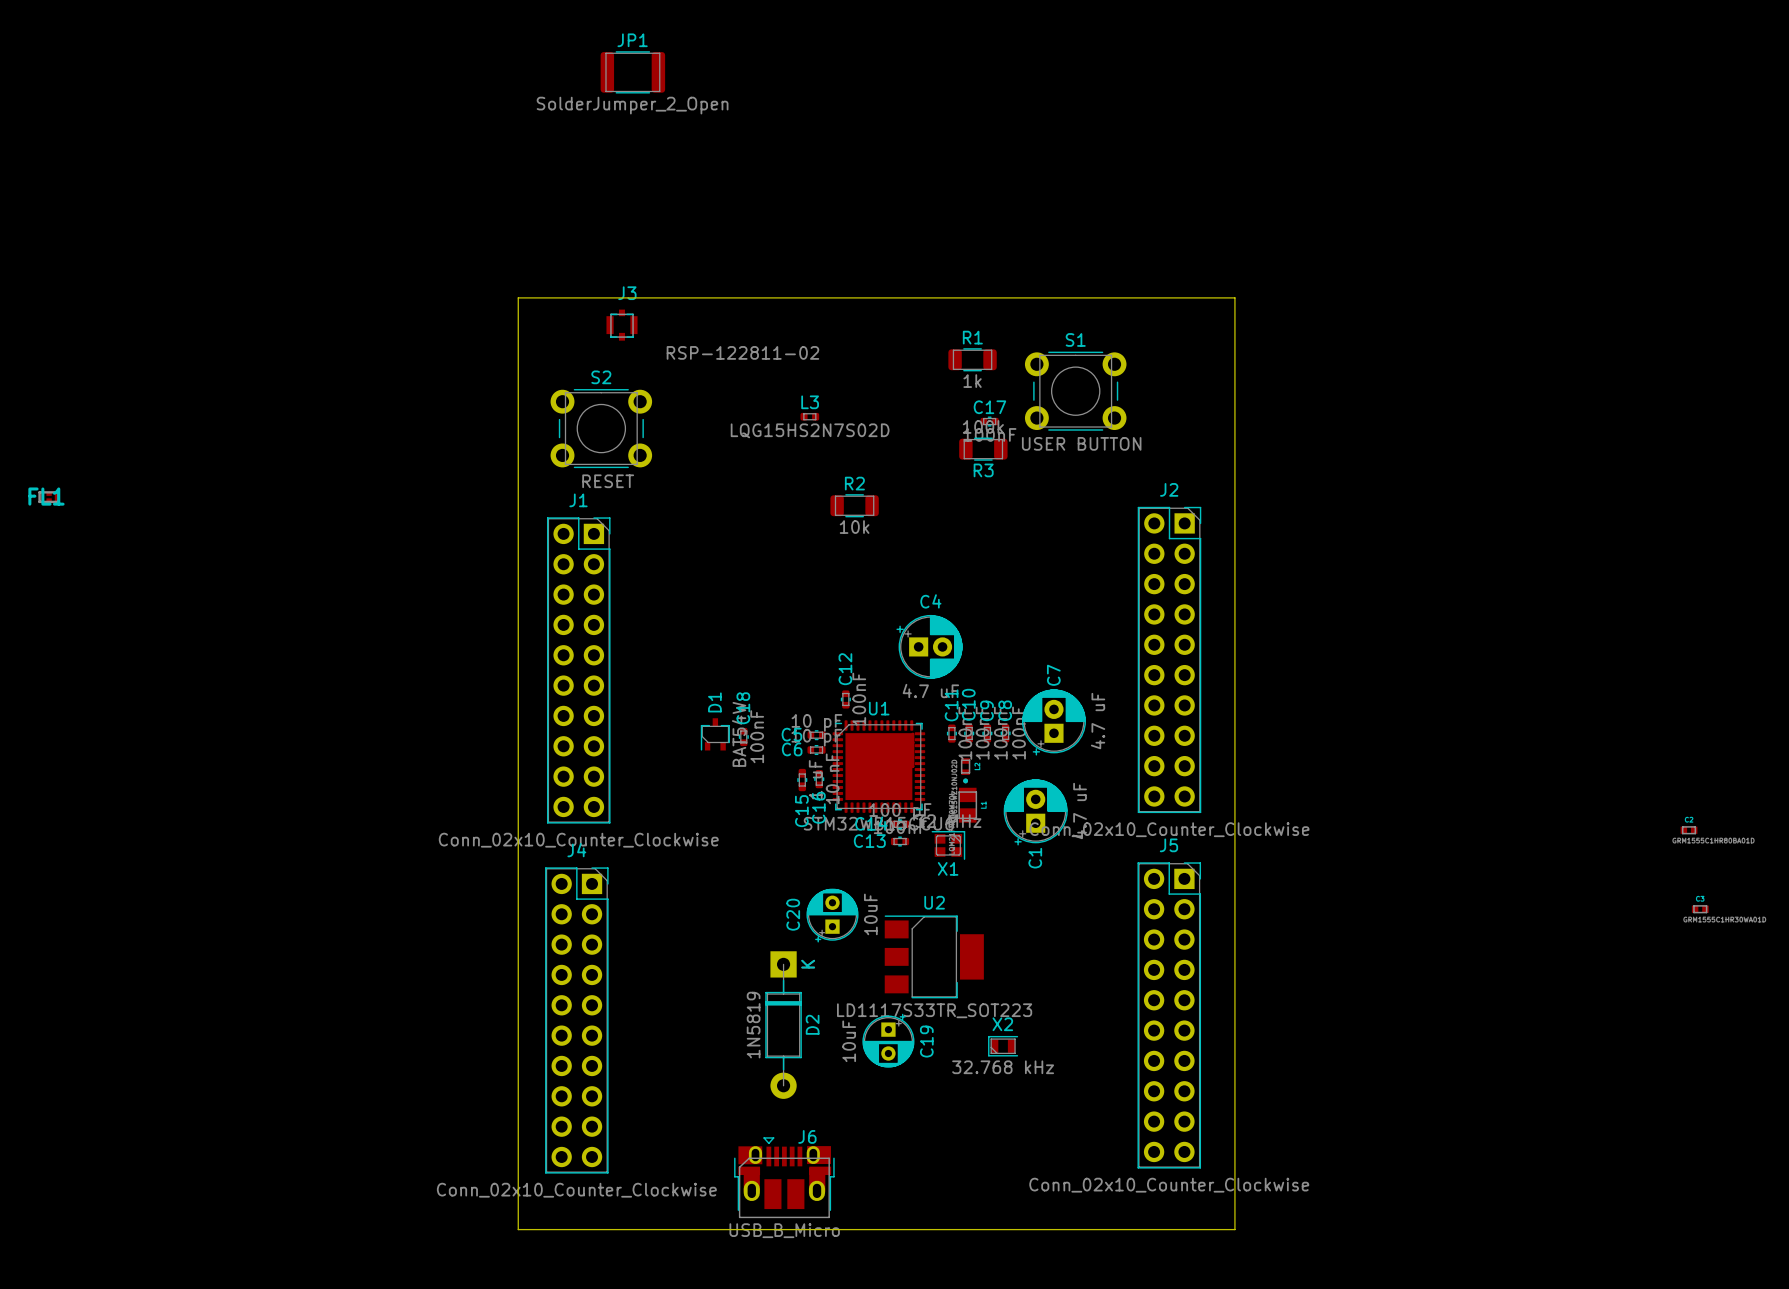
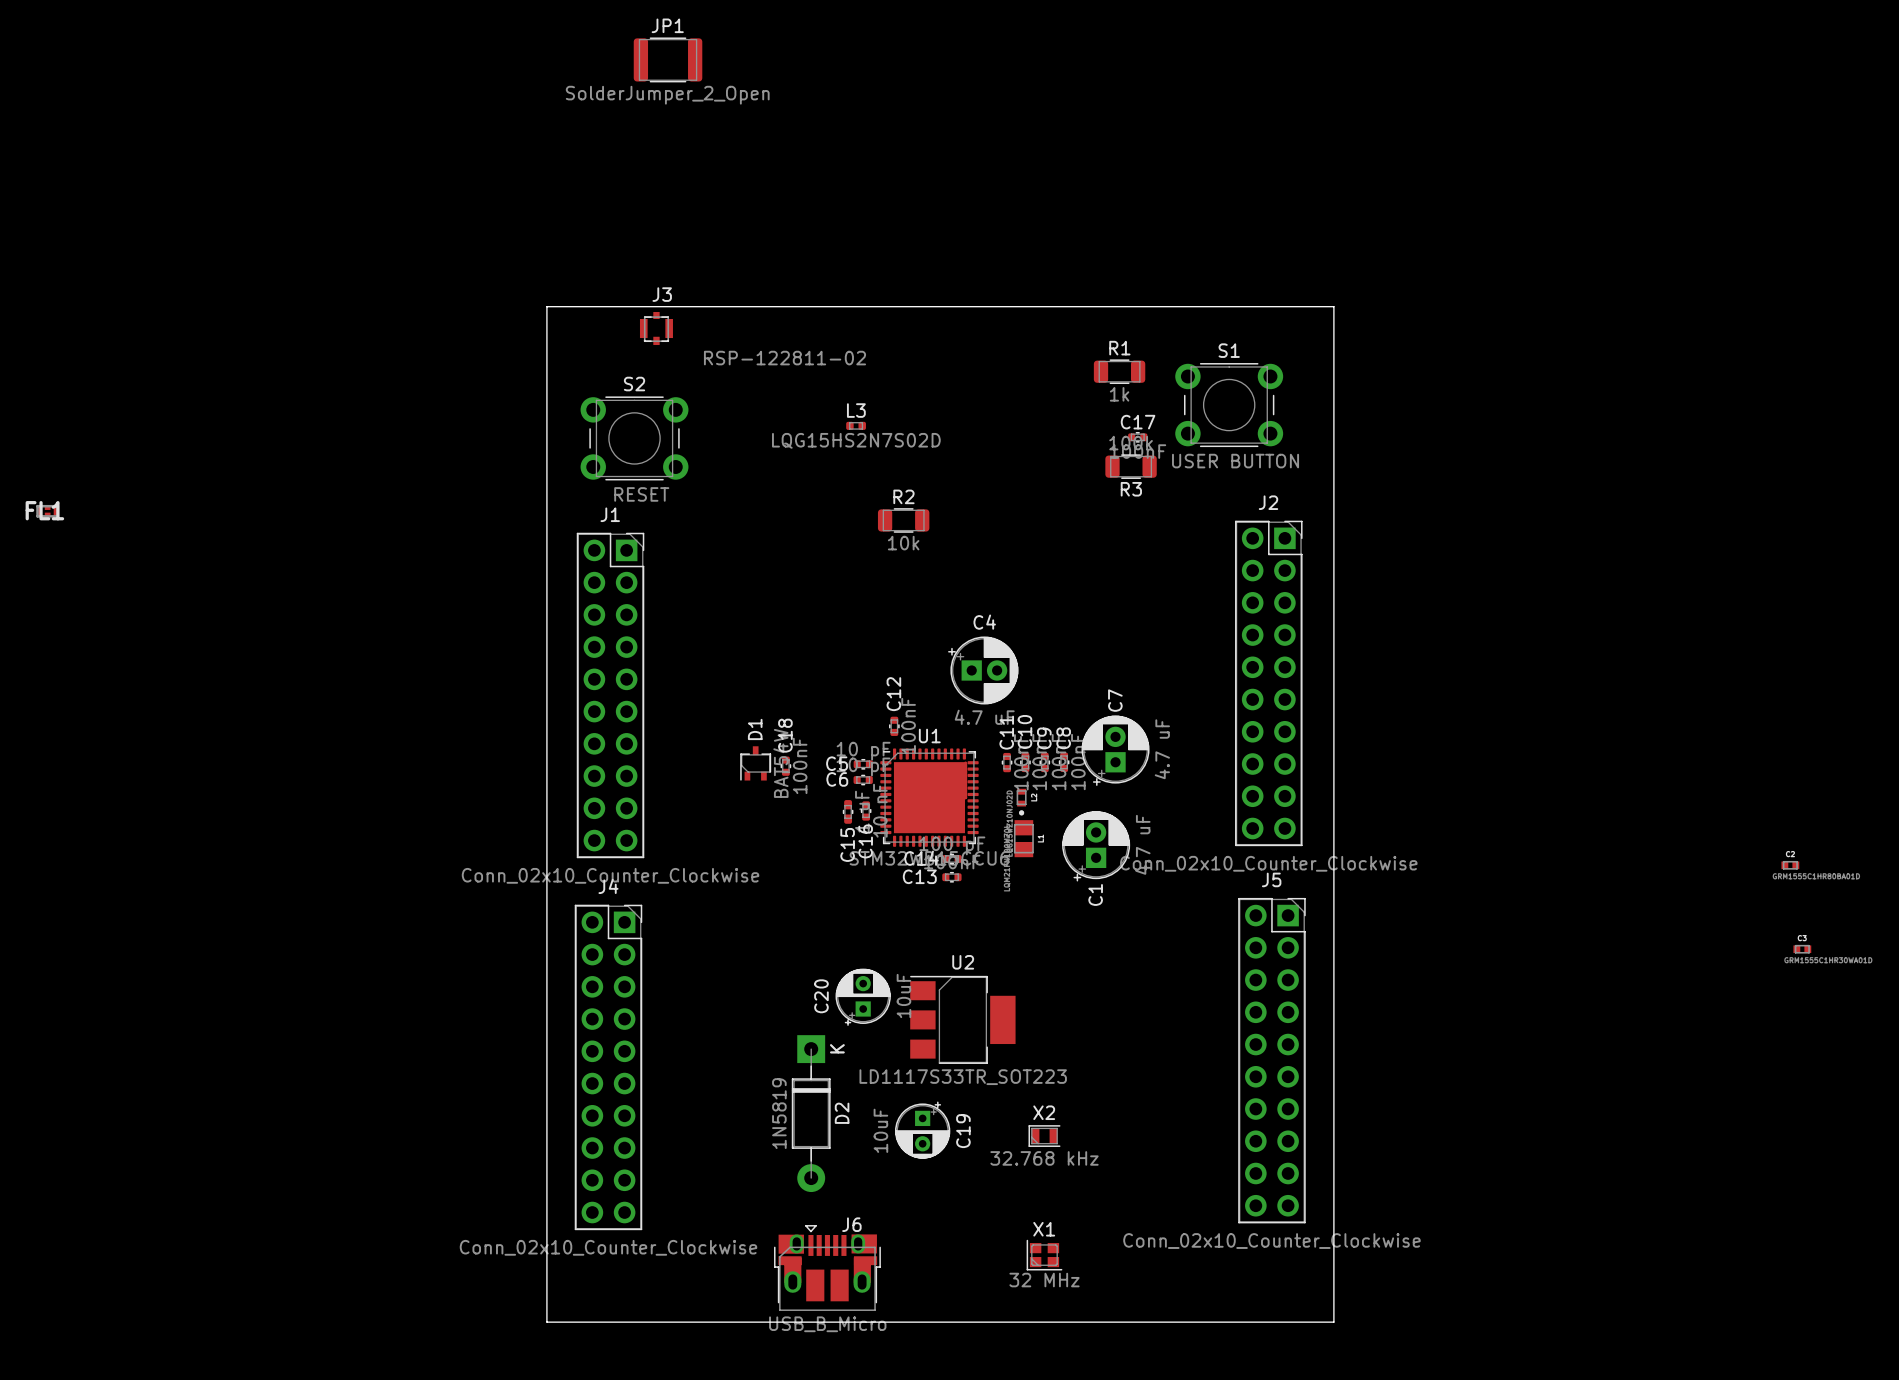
board edge: (518, 297) (1234, 297) (1234, 1229) (518, 1229) (518, 297) -> (546, 306) (546, 1322) (1333, 1322) (1333, 306) (546, 306)
R1 position: (972, 359) -> (1119, 371)
S1 position: (1075, 391) -> (1229, 405)
C17 position: (989, 421) -> (1137, 437)
R3 position: (983, 449) -> (1131, 466)
J2 position: (1169, 659) -> (1268, 683)
X1 rotation: 0° (948, 845) -> 180° (1044, 1255)
X1 position: (948, 845) -> (1044, 1255)
C20 position: (832, 915) -> (863, 997)
U2 position: (934, 956) -> (962, 1019)
J5 position: (1169, 1015) -> (1271, 1060)
D2 position: (783, 1025) -> (811, 1113)
C19 position: (888, 1040) -> (922, 1130)
X2 position: (1003, 1046) -> (1044, 1136)
J6 position: (784, 1177) -> (827, 1268)

